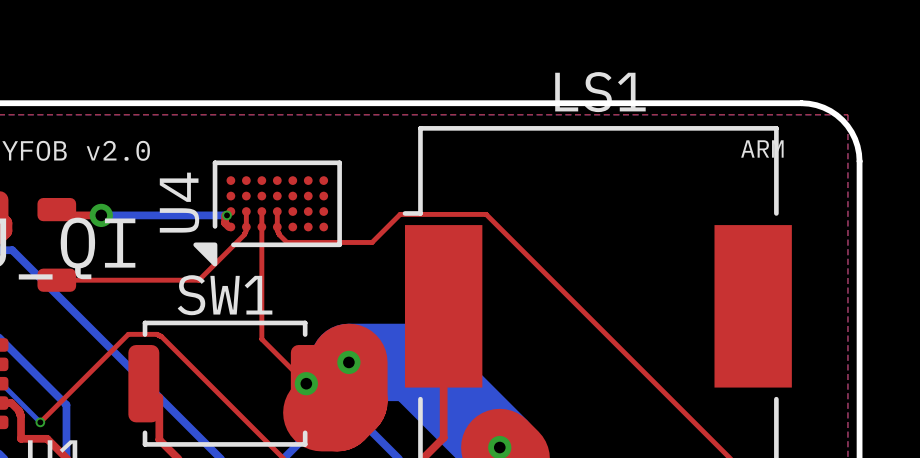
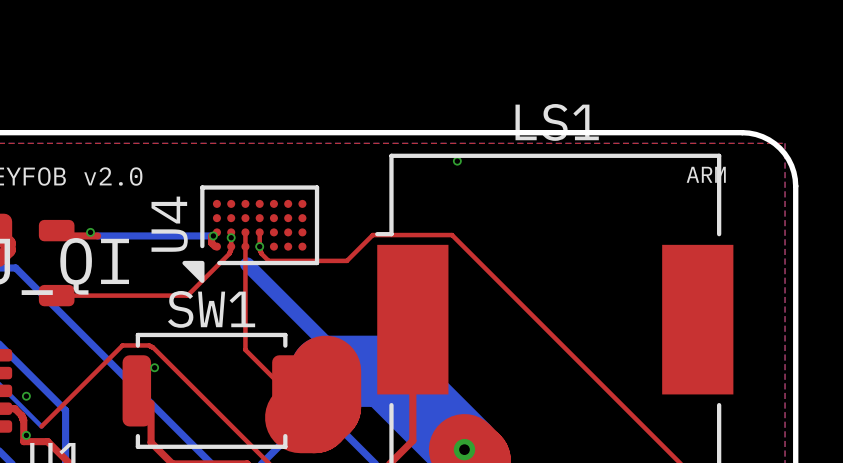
via: none -> (457, 161)
via size: [89, 203, 113, 228] -> [86, 227, 95, 237]
via: none -> (231, 237)
via: none -> (259, 246)
bottom track: none -> (247, 264) (339, 357) (339, 399)
via: none -> (154, 367)
via: (348, 362) -> none
via: (306, 383) -> none
via: none -> (26, 396)
via: (40, 422) -> none
via: none -> (26, 435)

